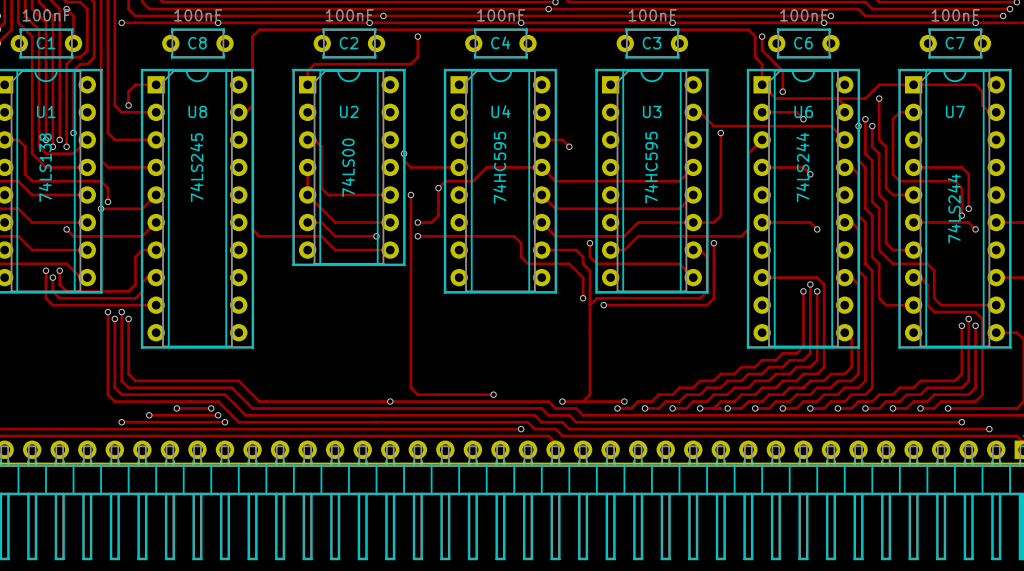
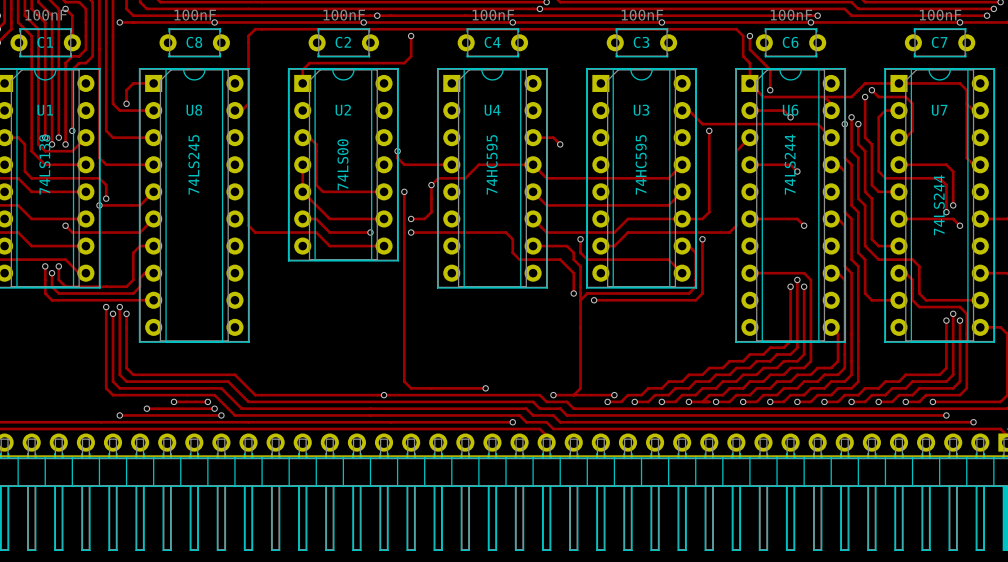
track: none -> (871, 90) (878, 97) (905, 97) (912, 103) (912, 130) (905, 137) (899, 137)
via: none -> (871, 90)
track: none -> (966, 103) (966, 157) (973, 164) (980, 164)

